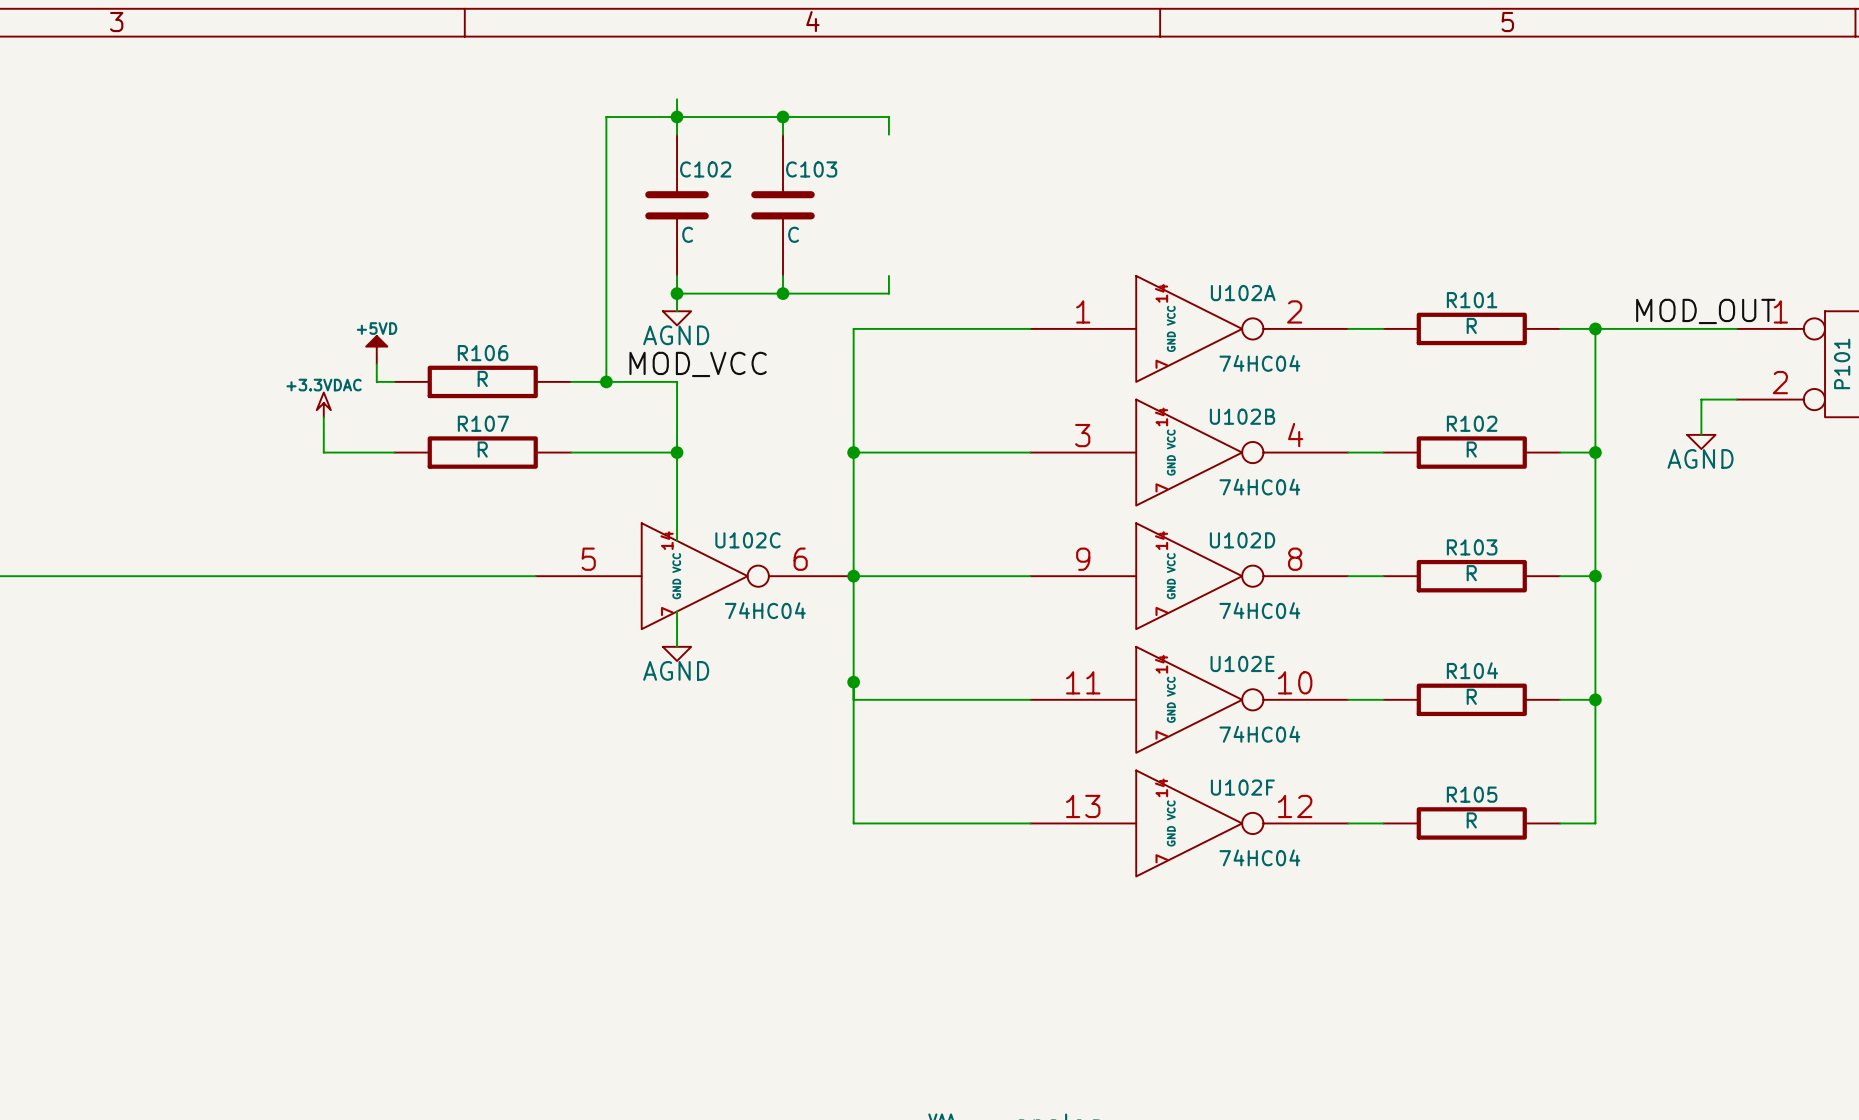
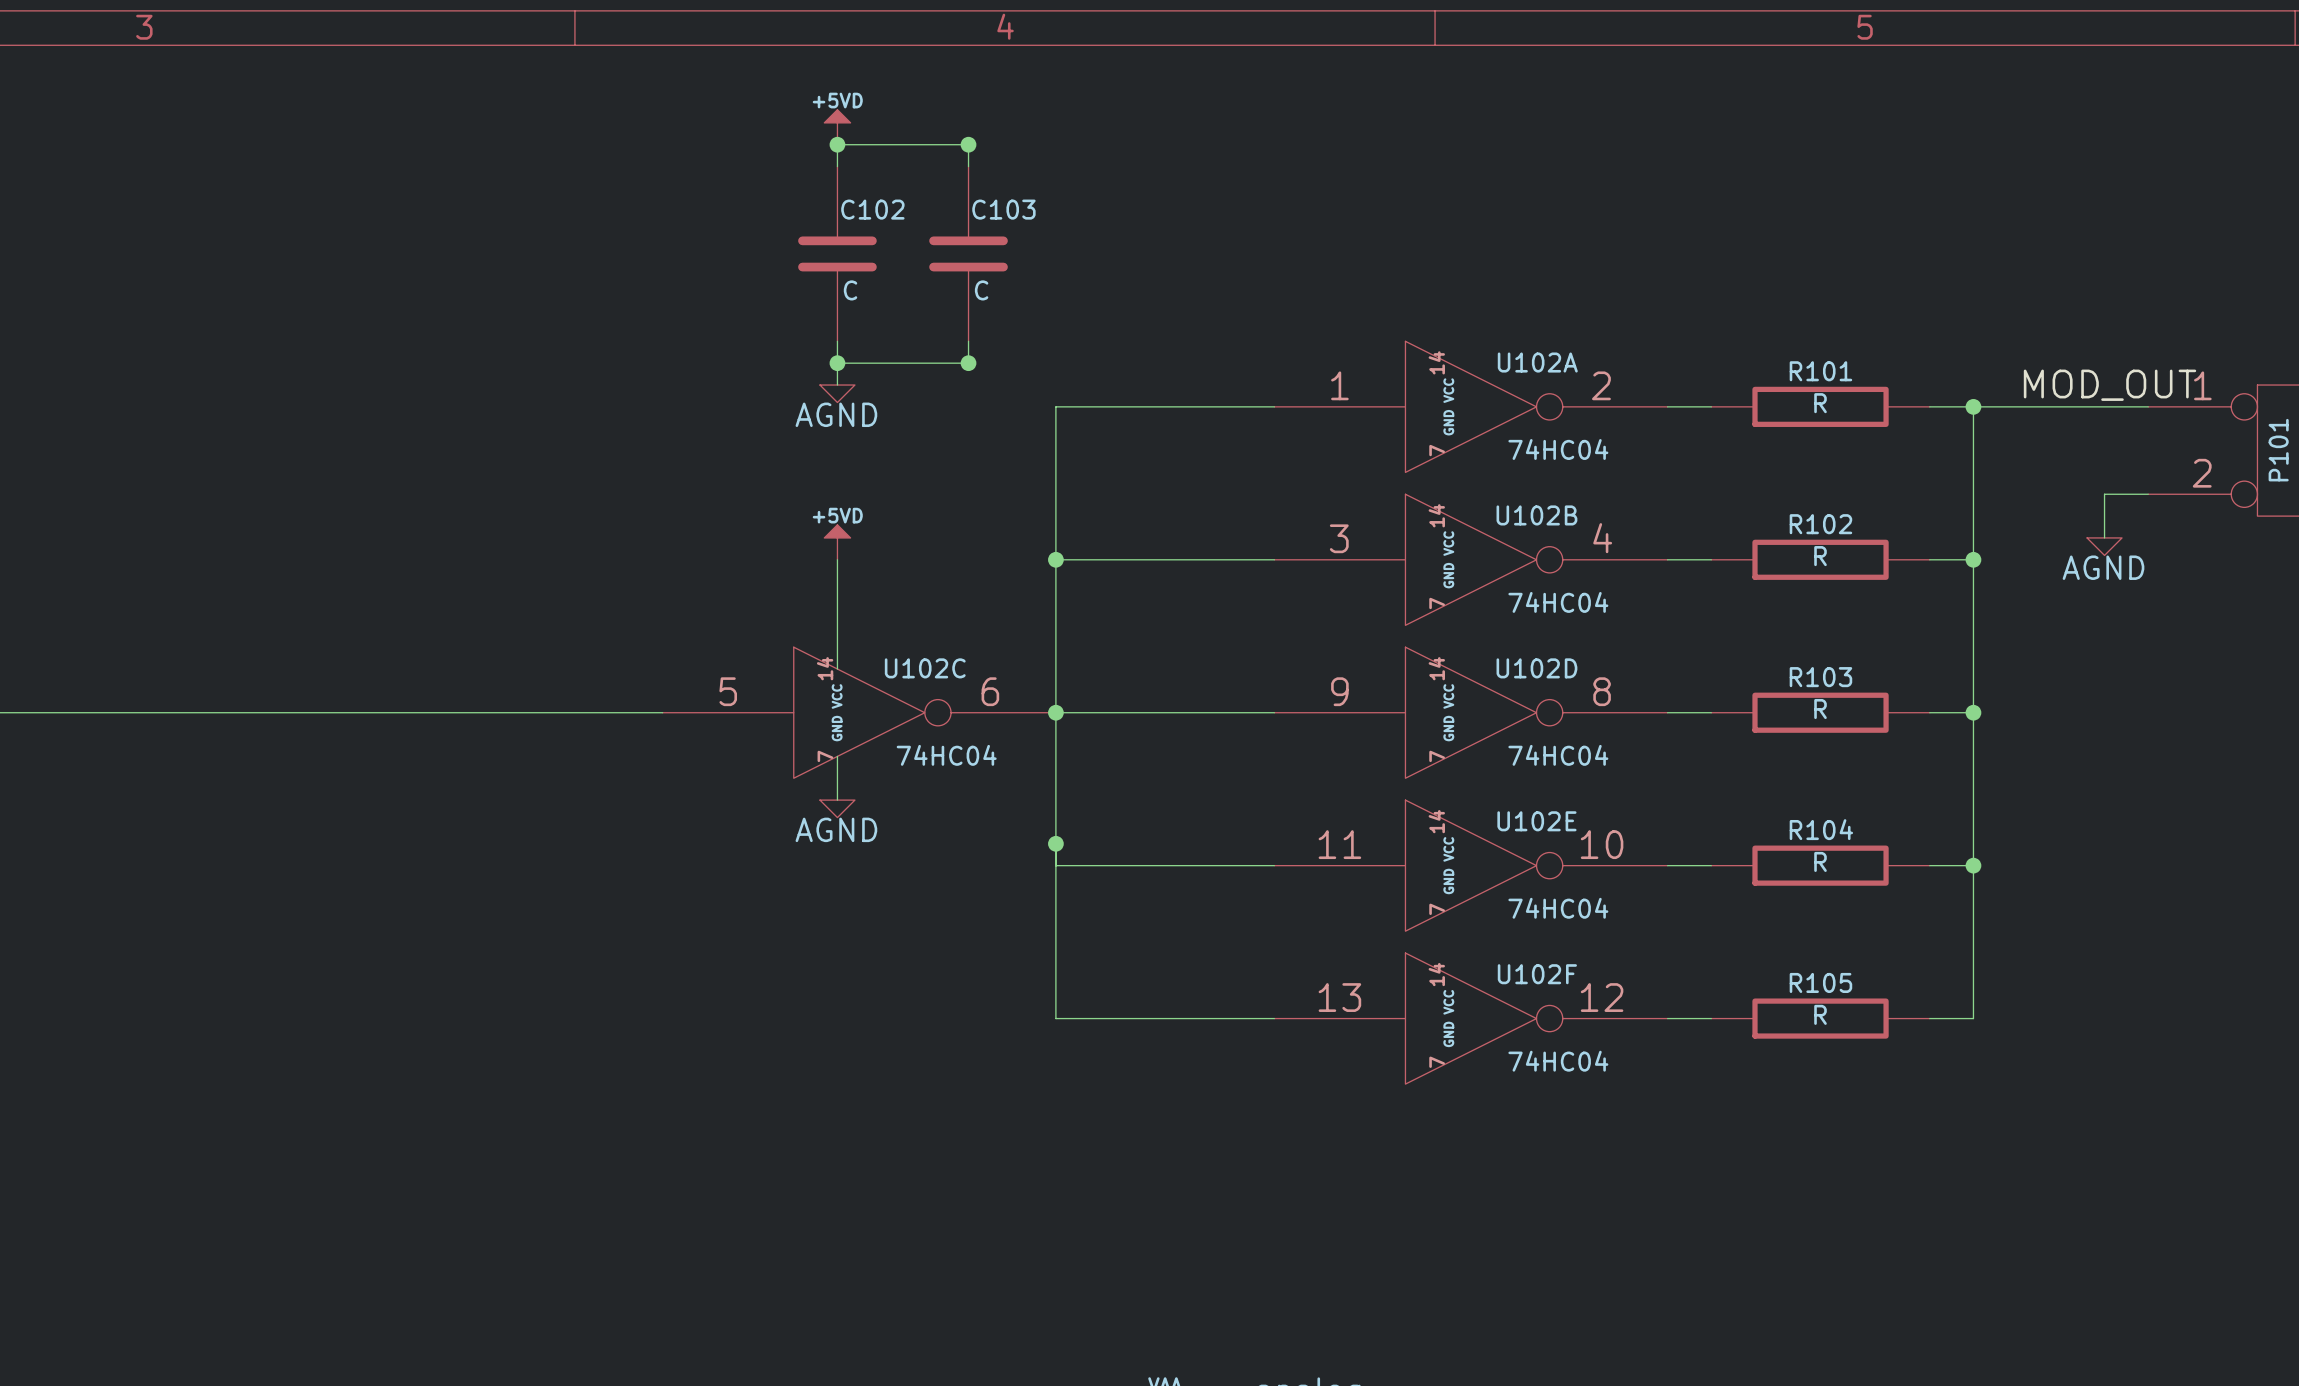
wire: (677, 99) (677, 116) (606, 116) (606, 381) -> none
power symbol: none -> +5VD (837, 127)
wire: (782, 116) (888, 116) (888, 134) -> none
wire: (888, 275) (888, 293) (782, 293) -> none
power symbol: +5VD (376, 350) -> none
wire: (376, 364) (376, 381) (394, 381) -> none
label: MOD_VCC (698, 364) -> none
R106: R (482, 381) -> none
wire: (571, 381) (677, 381) (677, 452) (571, 452) -> none
junction: (606, 381) -> none
power symbol: +3.3VDAC (323, 404) -> none
wire: (323, 417) (323, 452) (394, 452) -> none
power symbol: none -> +5VD (837, 542)
R107: R (482, 452) -> none
junction: (677, 452) -> none

